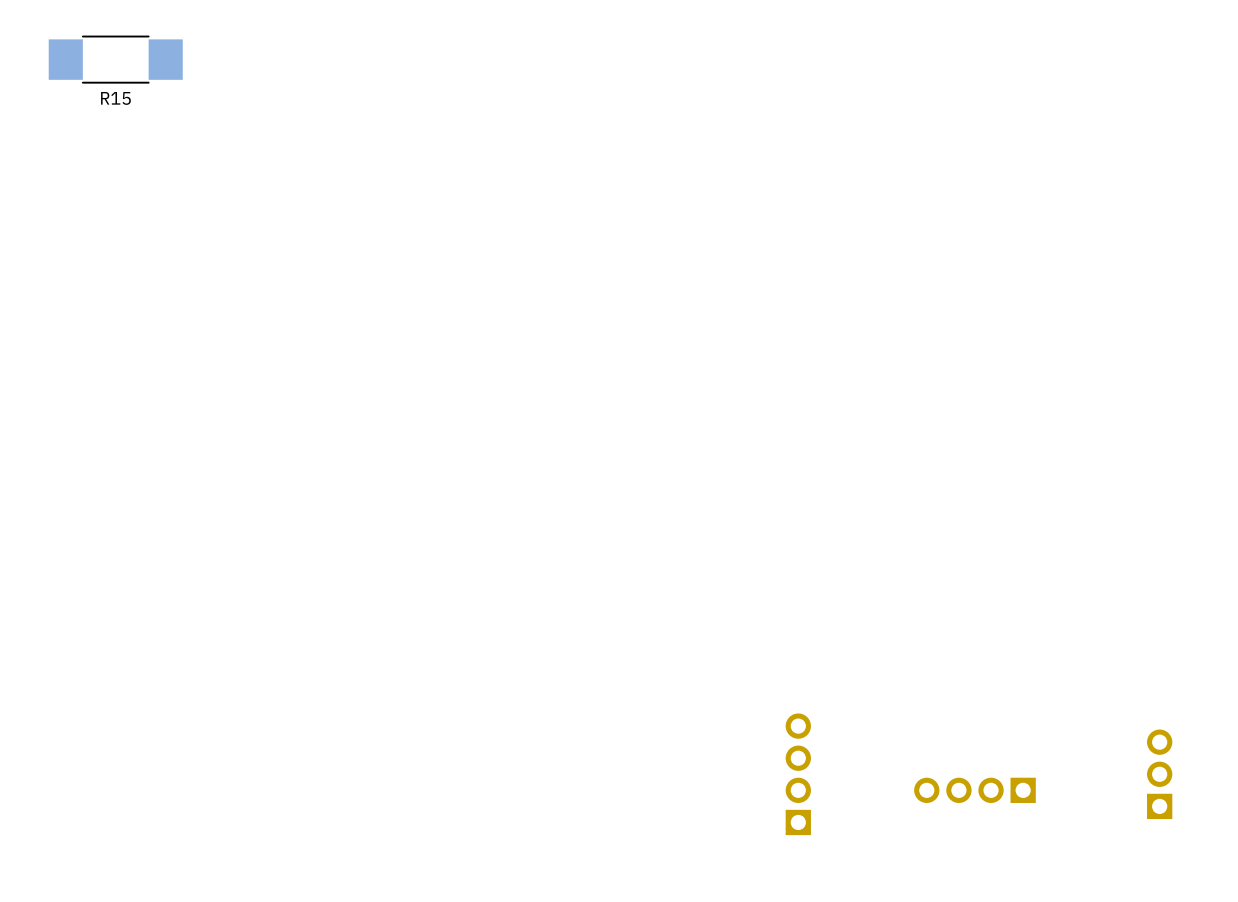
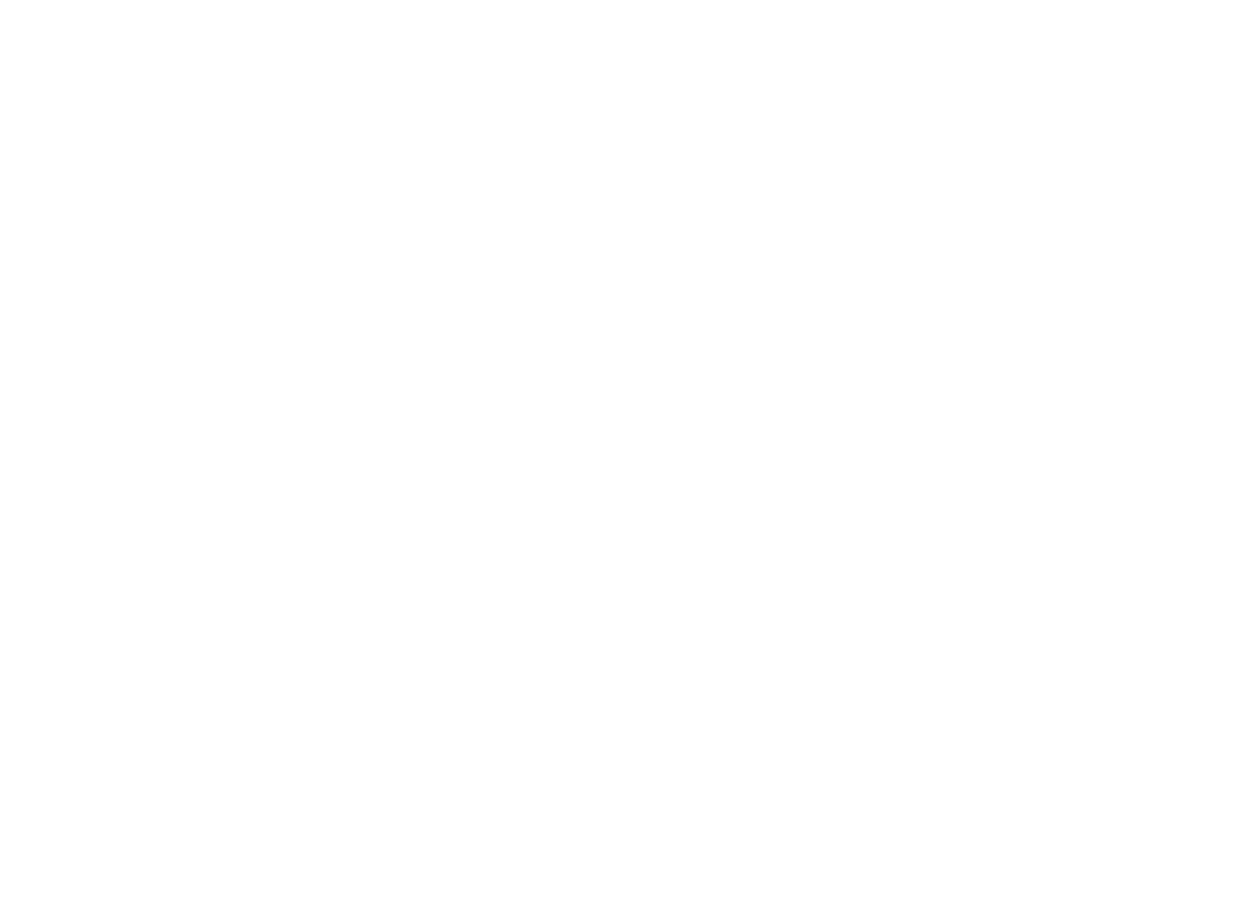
R15: (115, 59) -> none
part: (798, 774) -> none
part: (1159, 774) -> none
part: (974, 790) -> none

